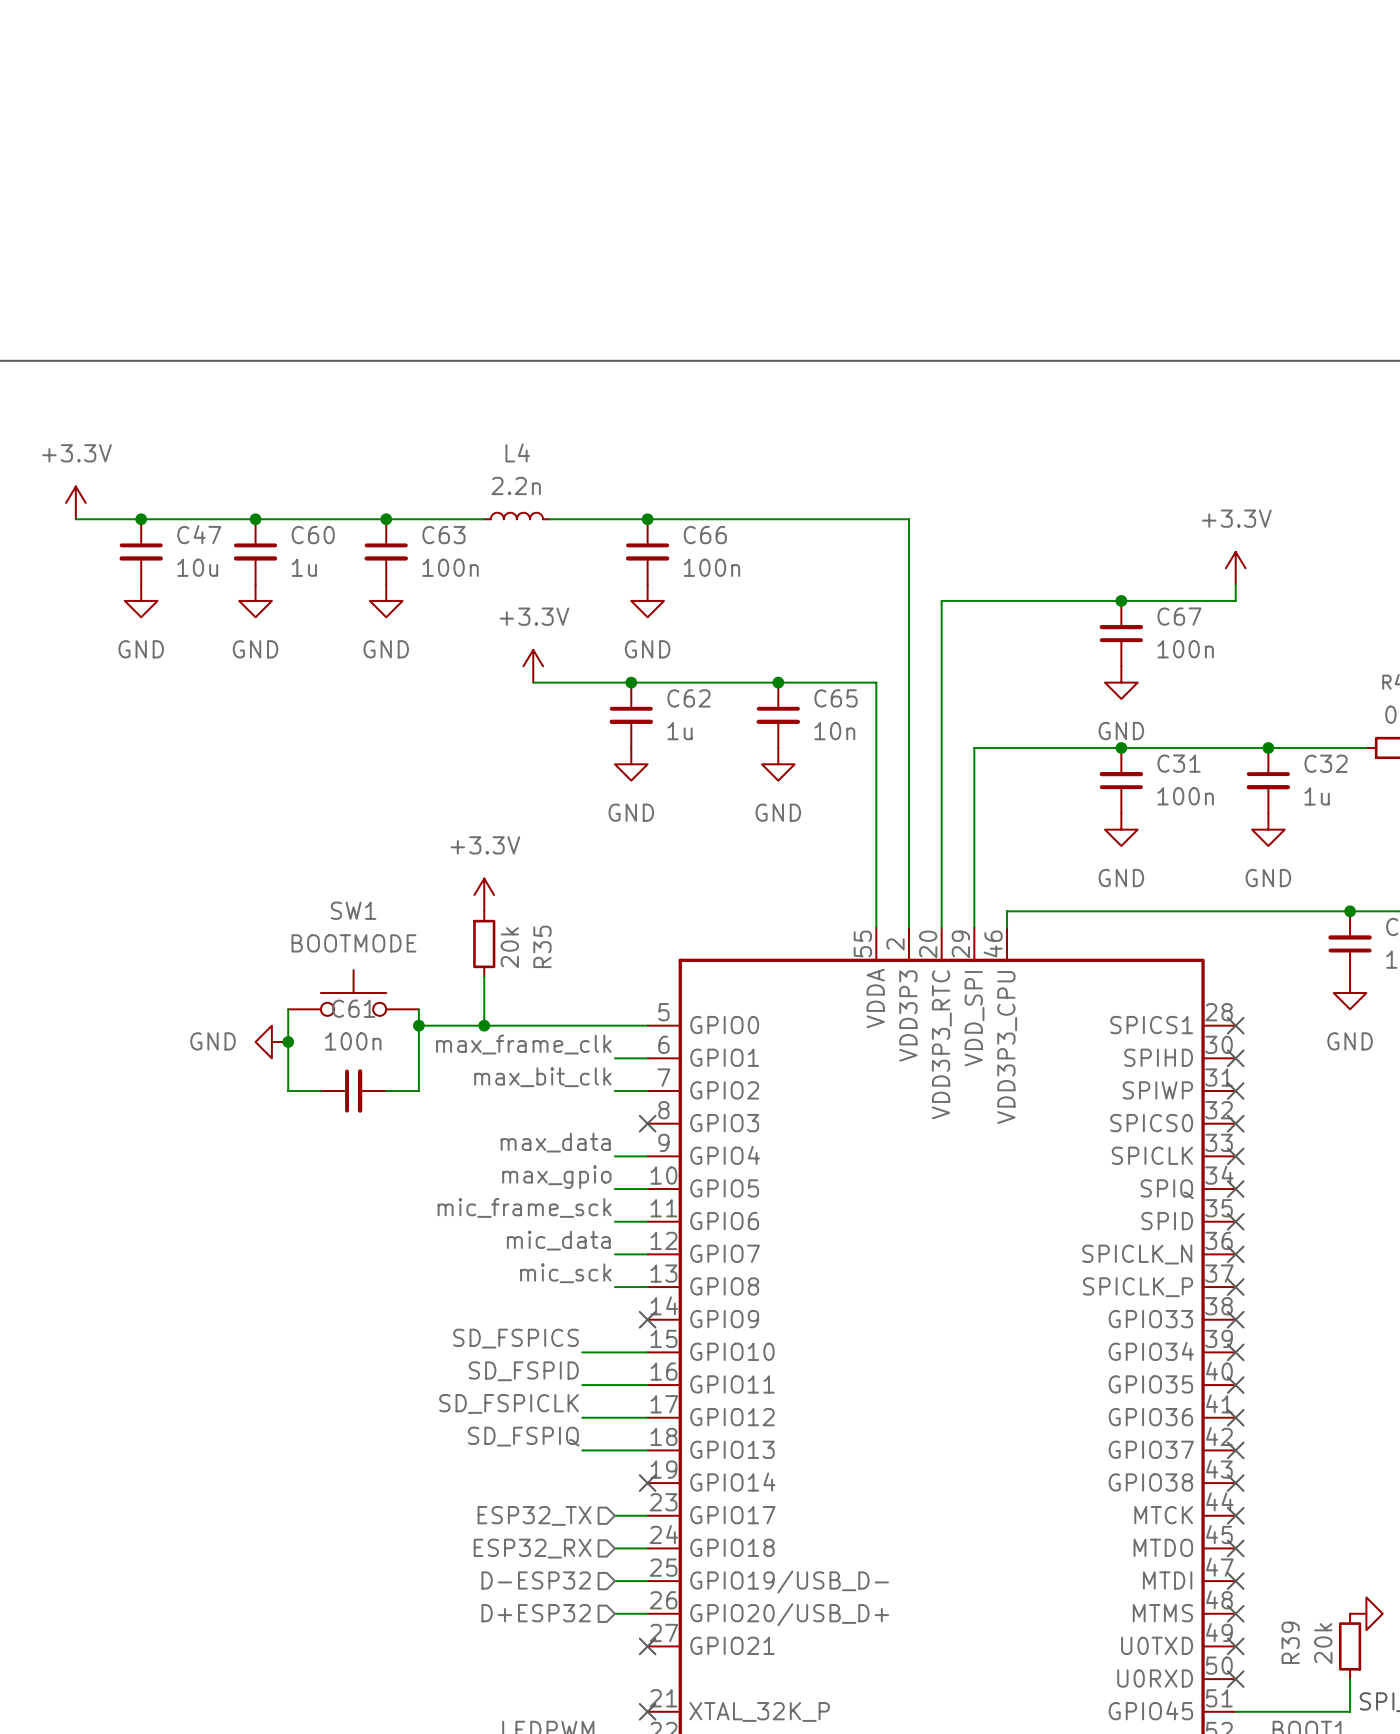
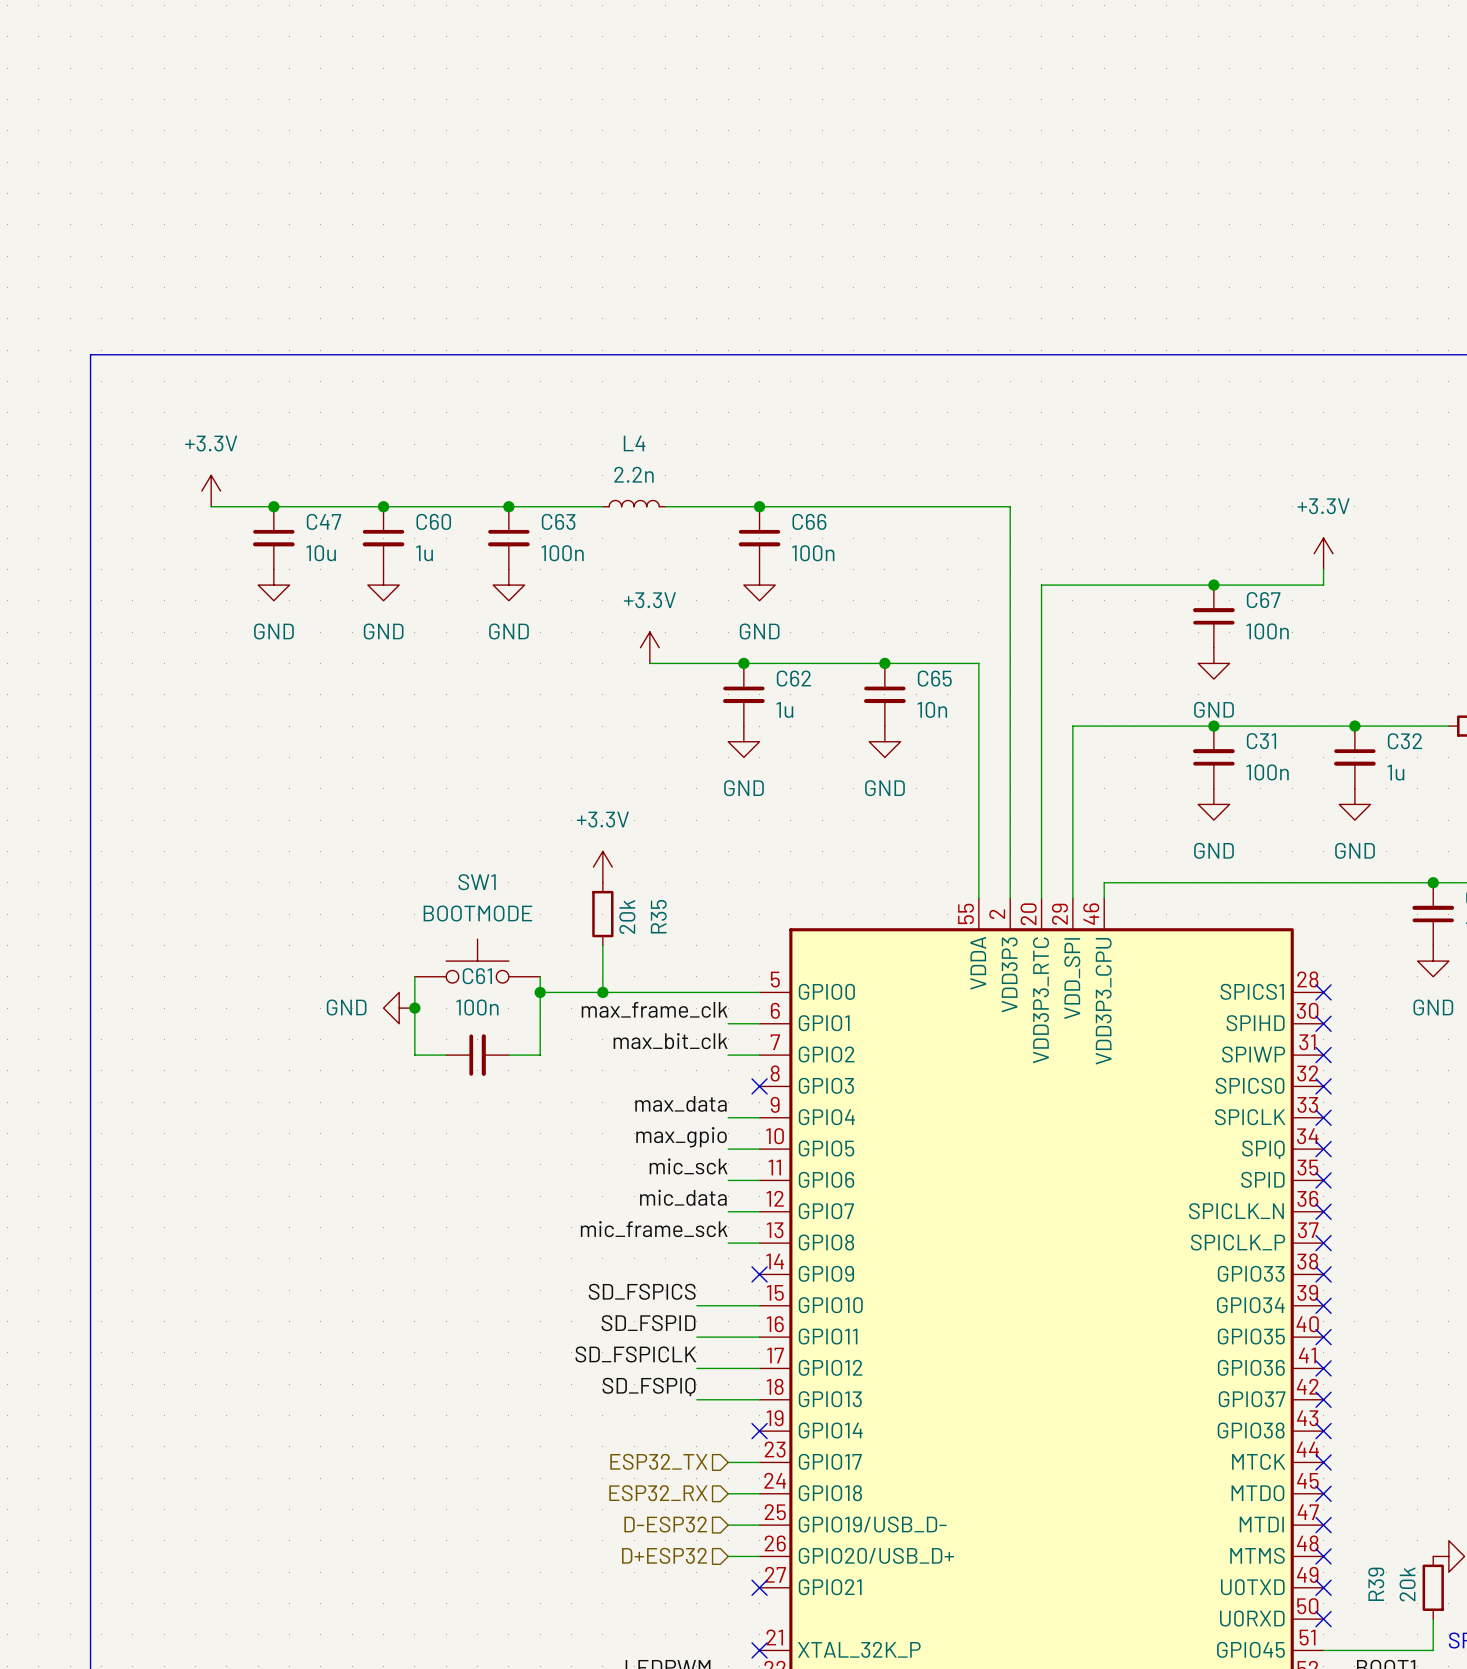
label: mic_frame_sck (524, 1207) -> mic_sck (688, 1166)
label: mic_sck (565, 1273) -> mic_frame_sck (654, 1229)

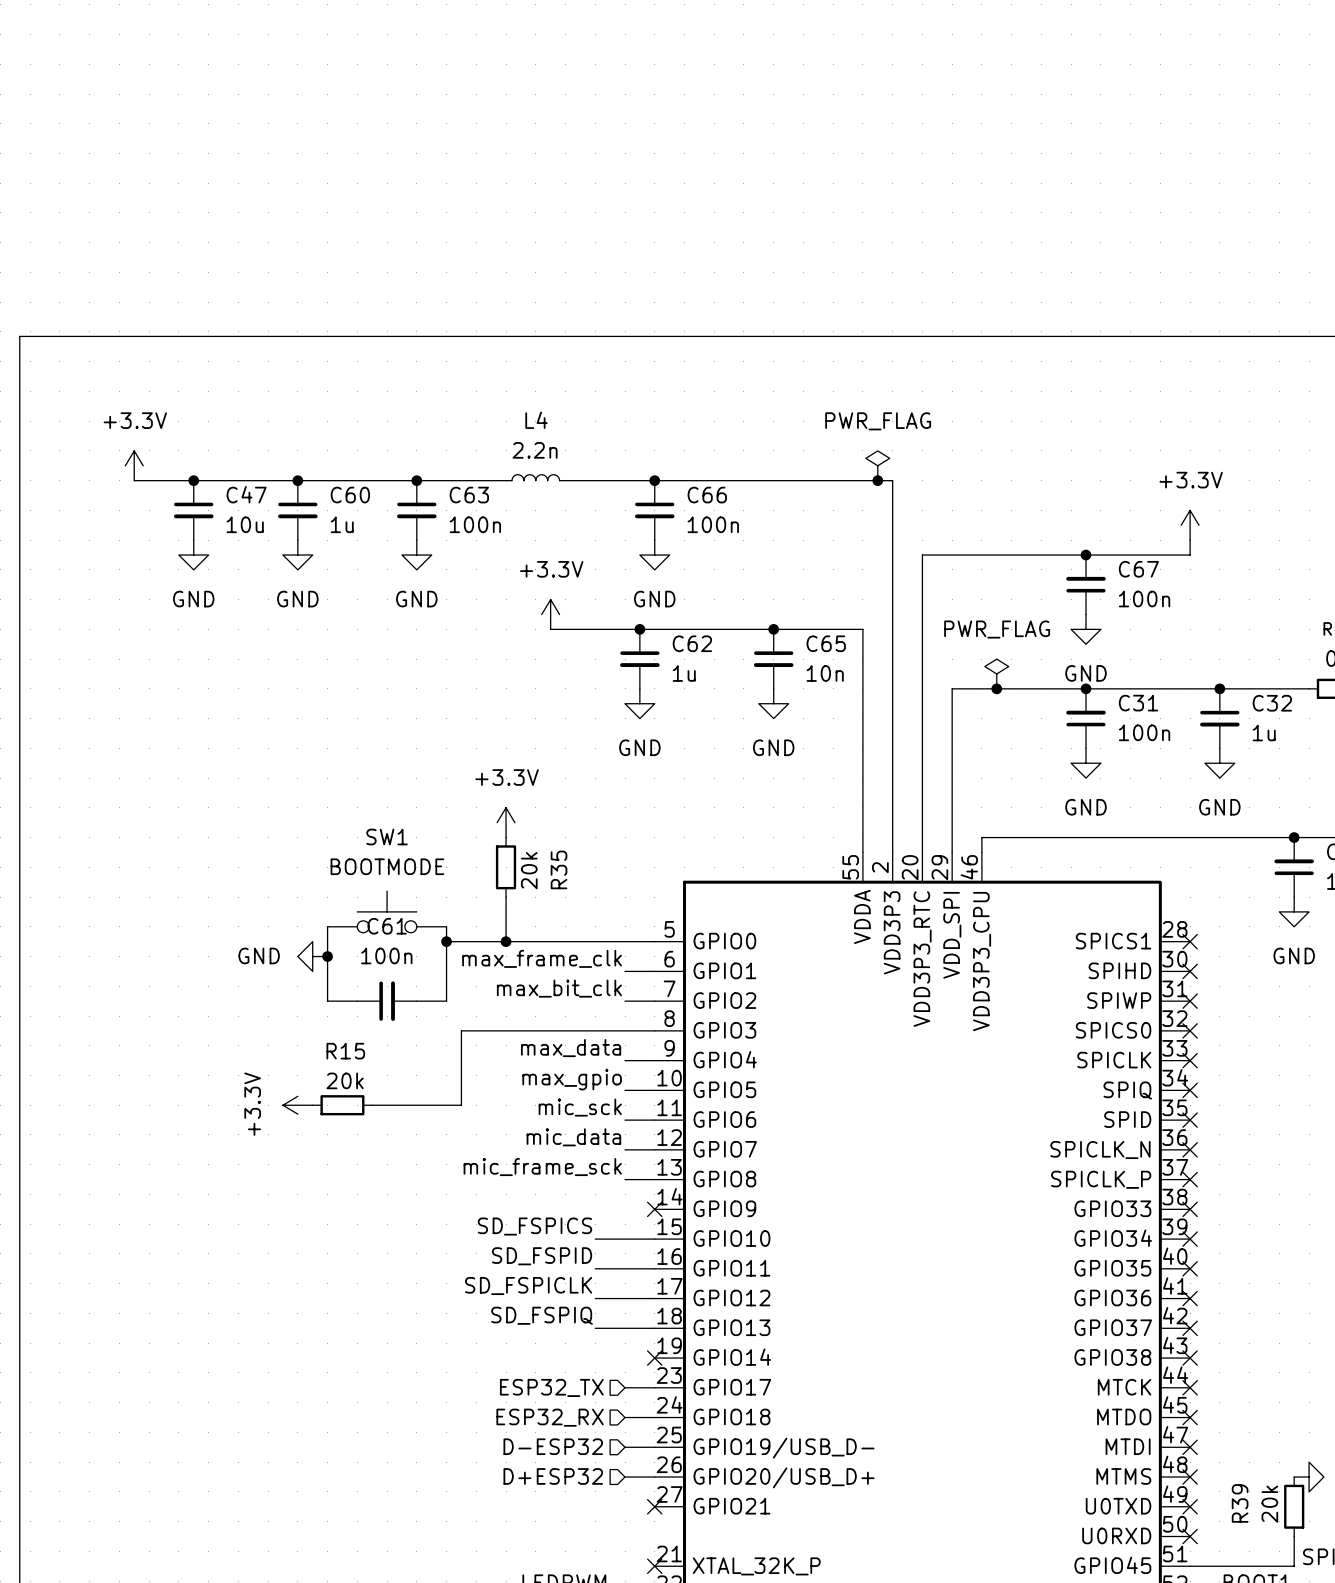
power symbol: none -> PWR_FLAG (877, 465)
junction: none -> (877, 480)
power symbol: none -> PWR_FLAG (996, 673)
junction: none -> (996, 688)
wire: none -> (654, 1030) (461, 1030) (461, 1105) (372, 1105)
no-connect mark: (759, 1086) -> none
power symbol: none -> +3.3V (297, 1105)
R15: none -> 20k (342, 1105)

